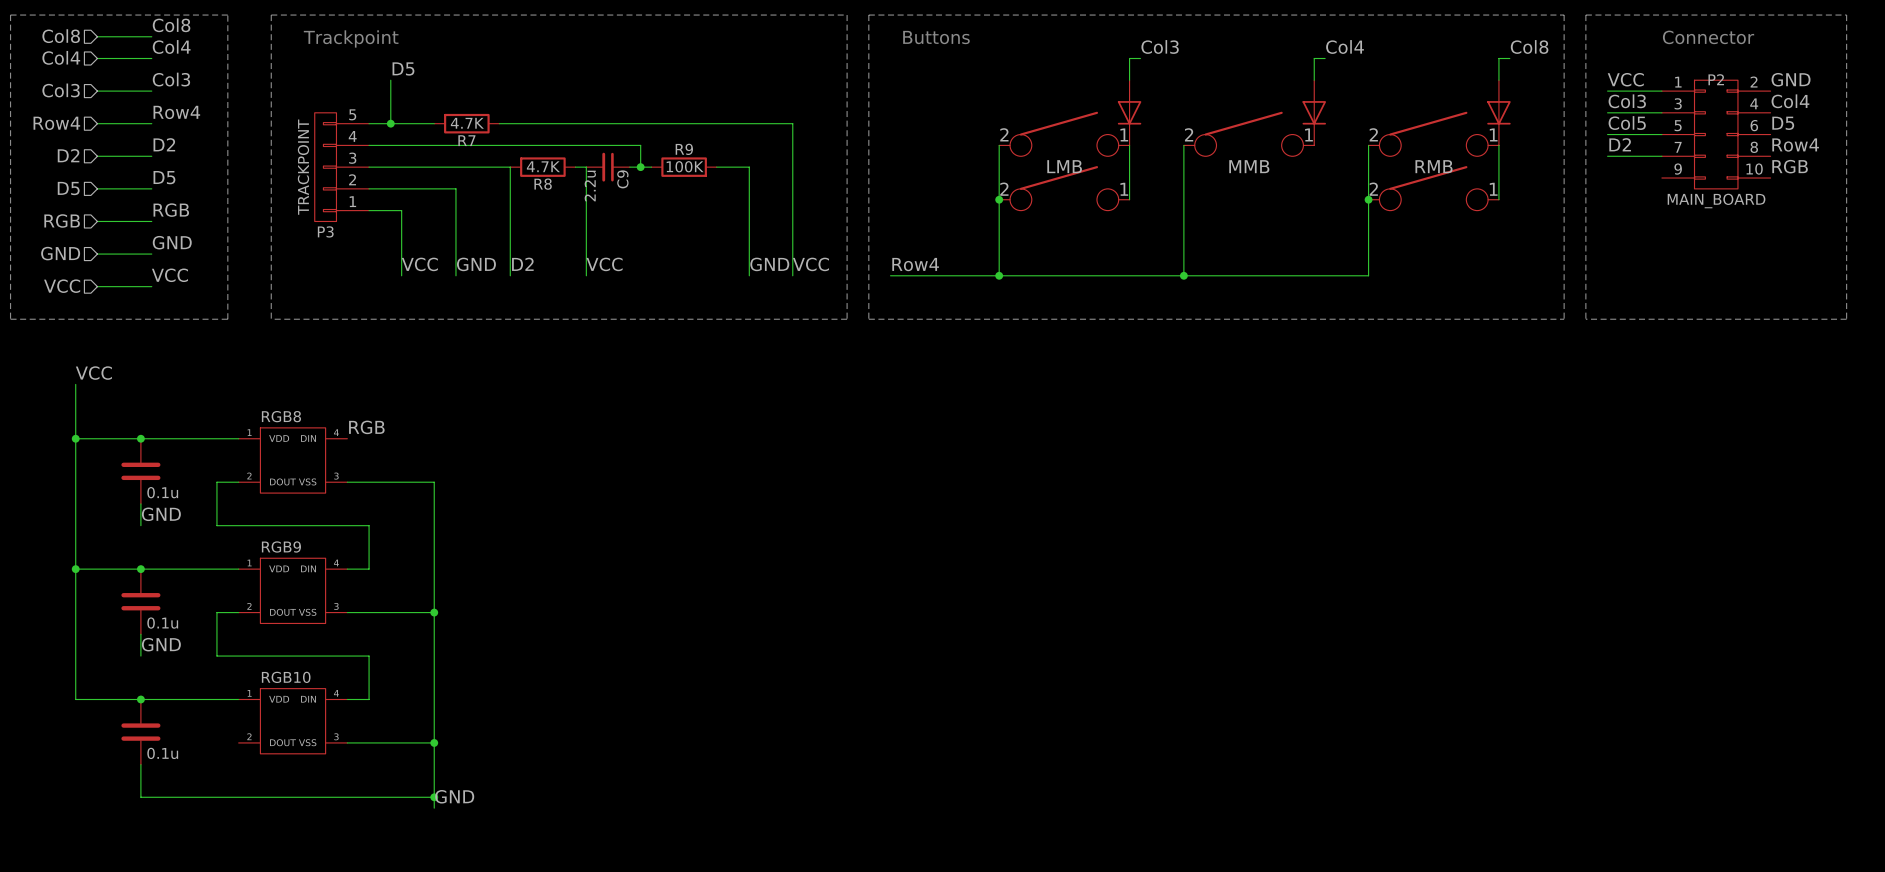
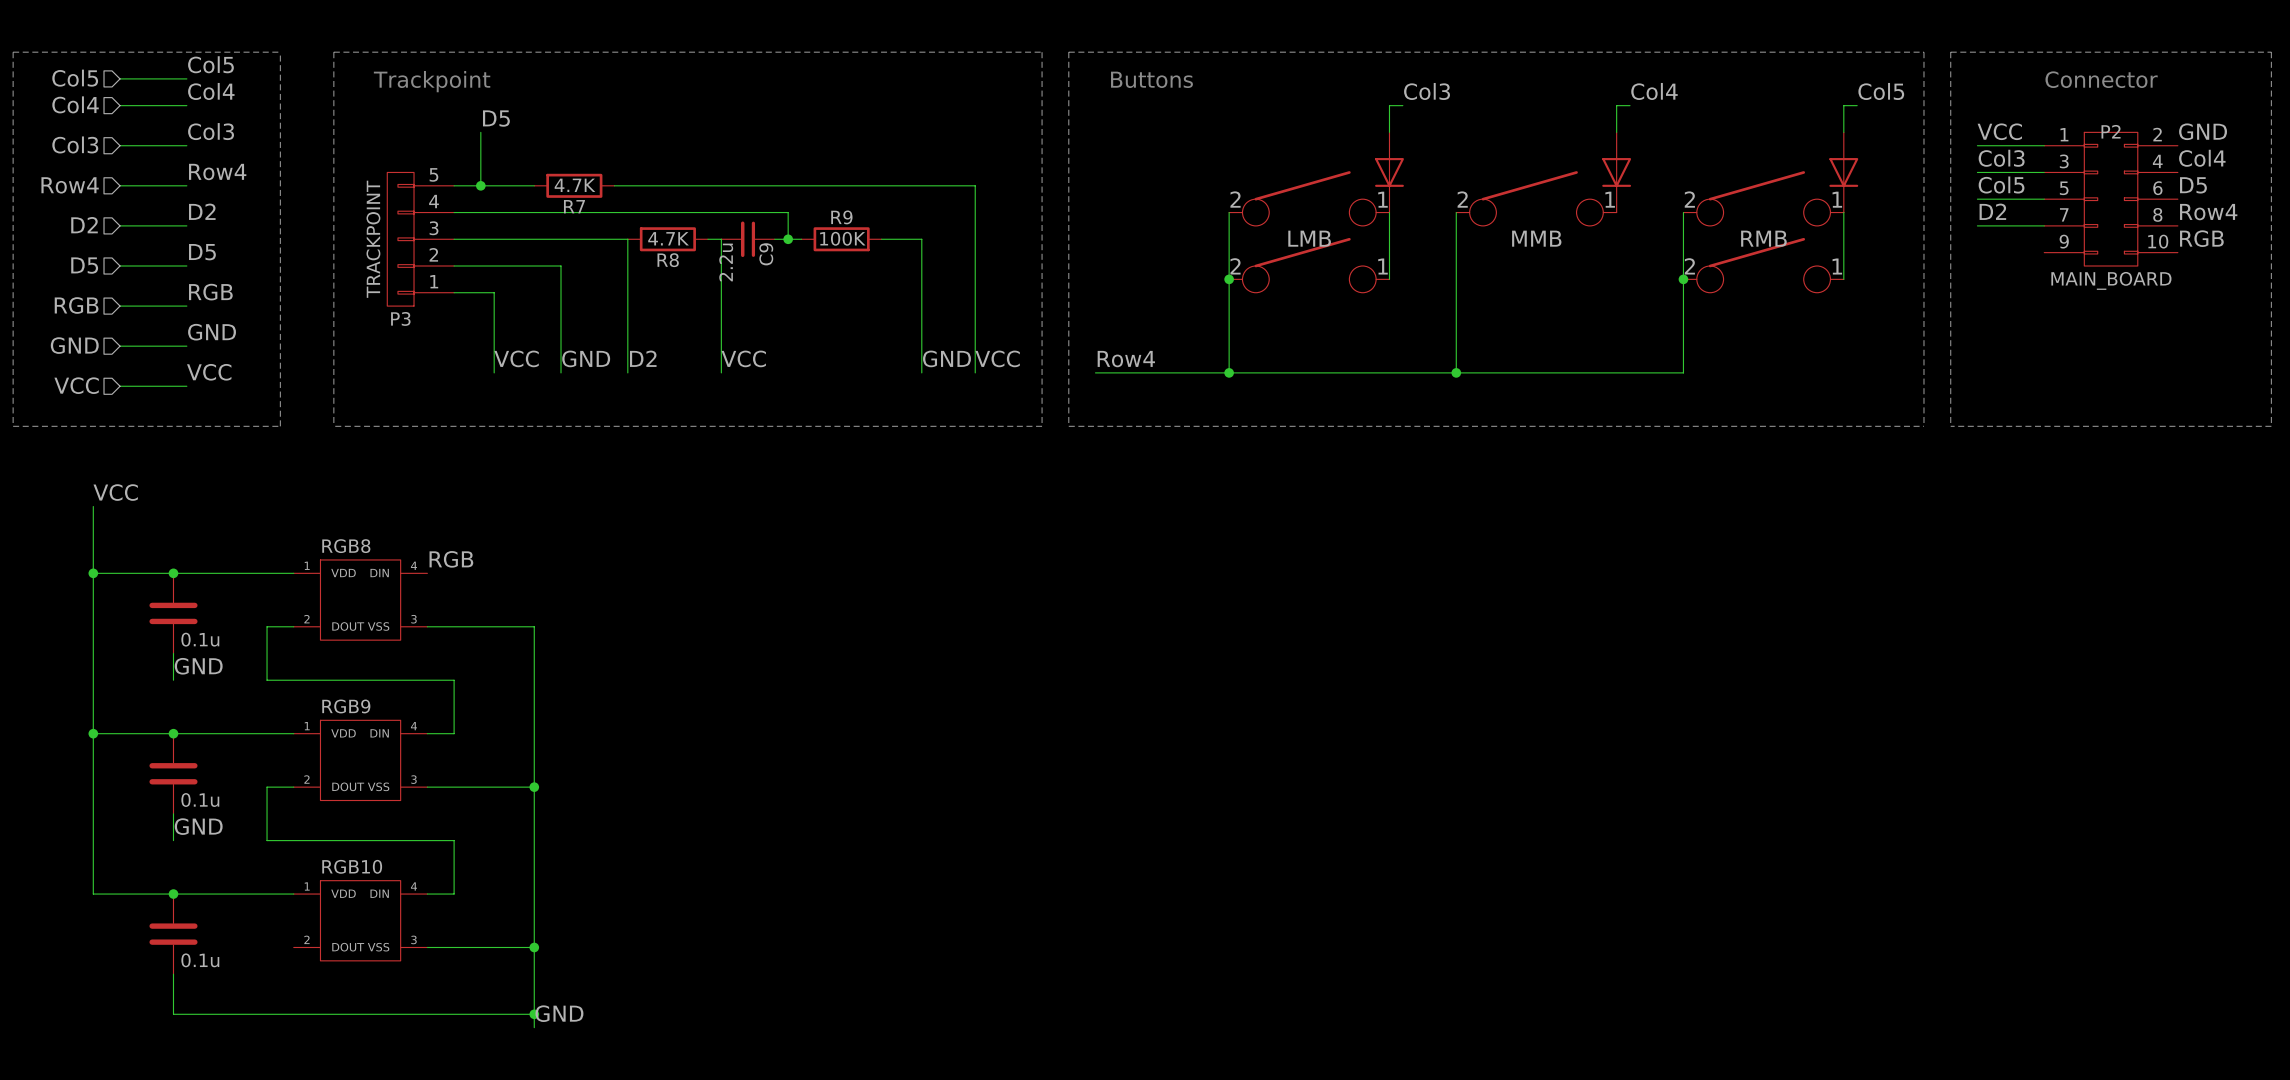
label: Col8 (171, 25) -> Col5 (210, 64)
hierarchical label: Col8 (61, 36) -> Col5 (75, 78)
label: Col8 (1529, 46) -> Col5 (1881, 91)

